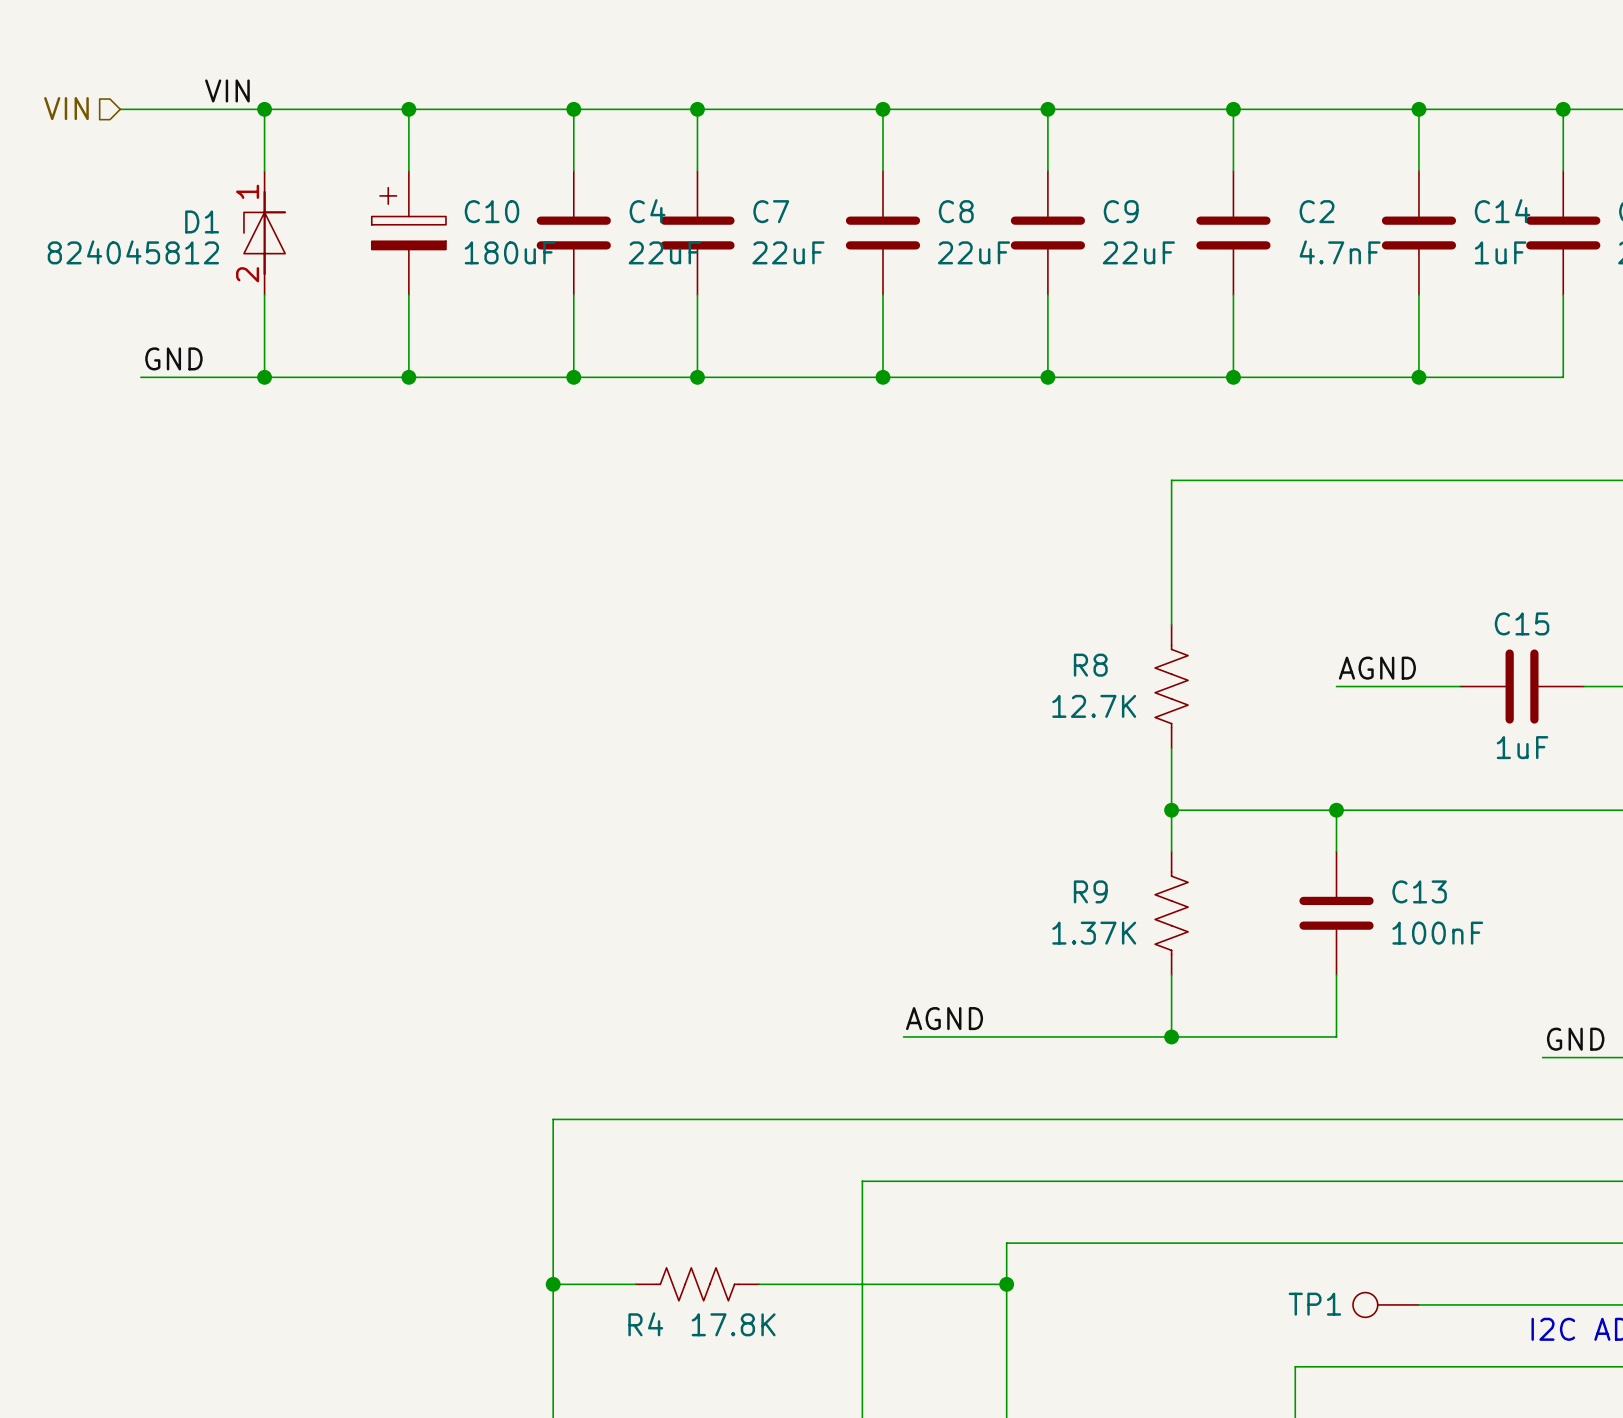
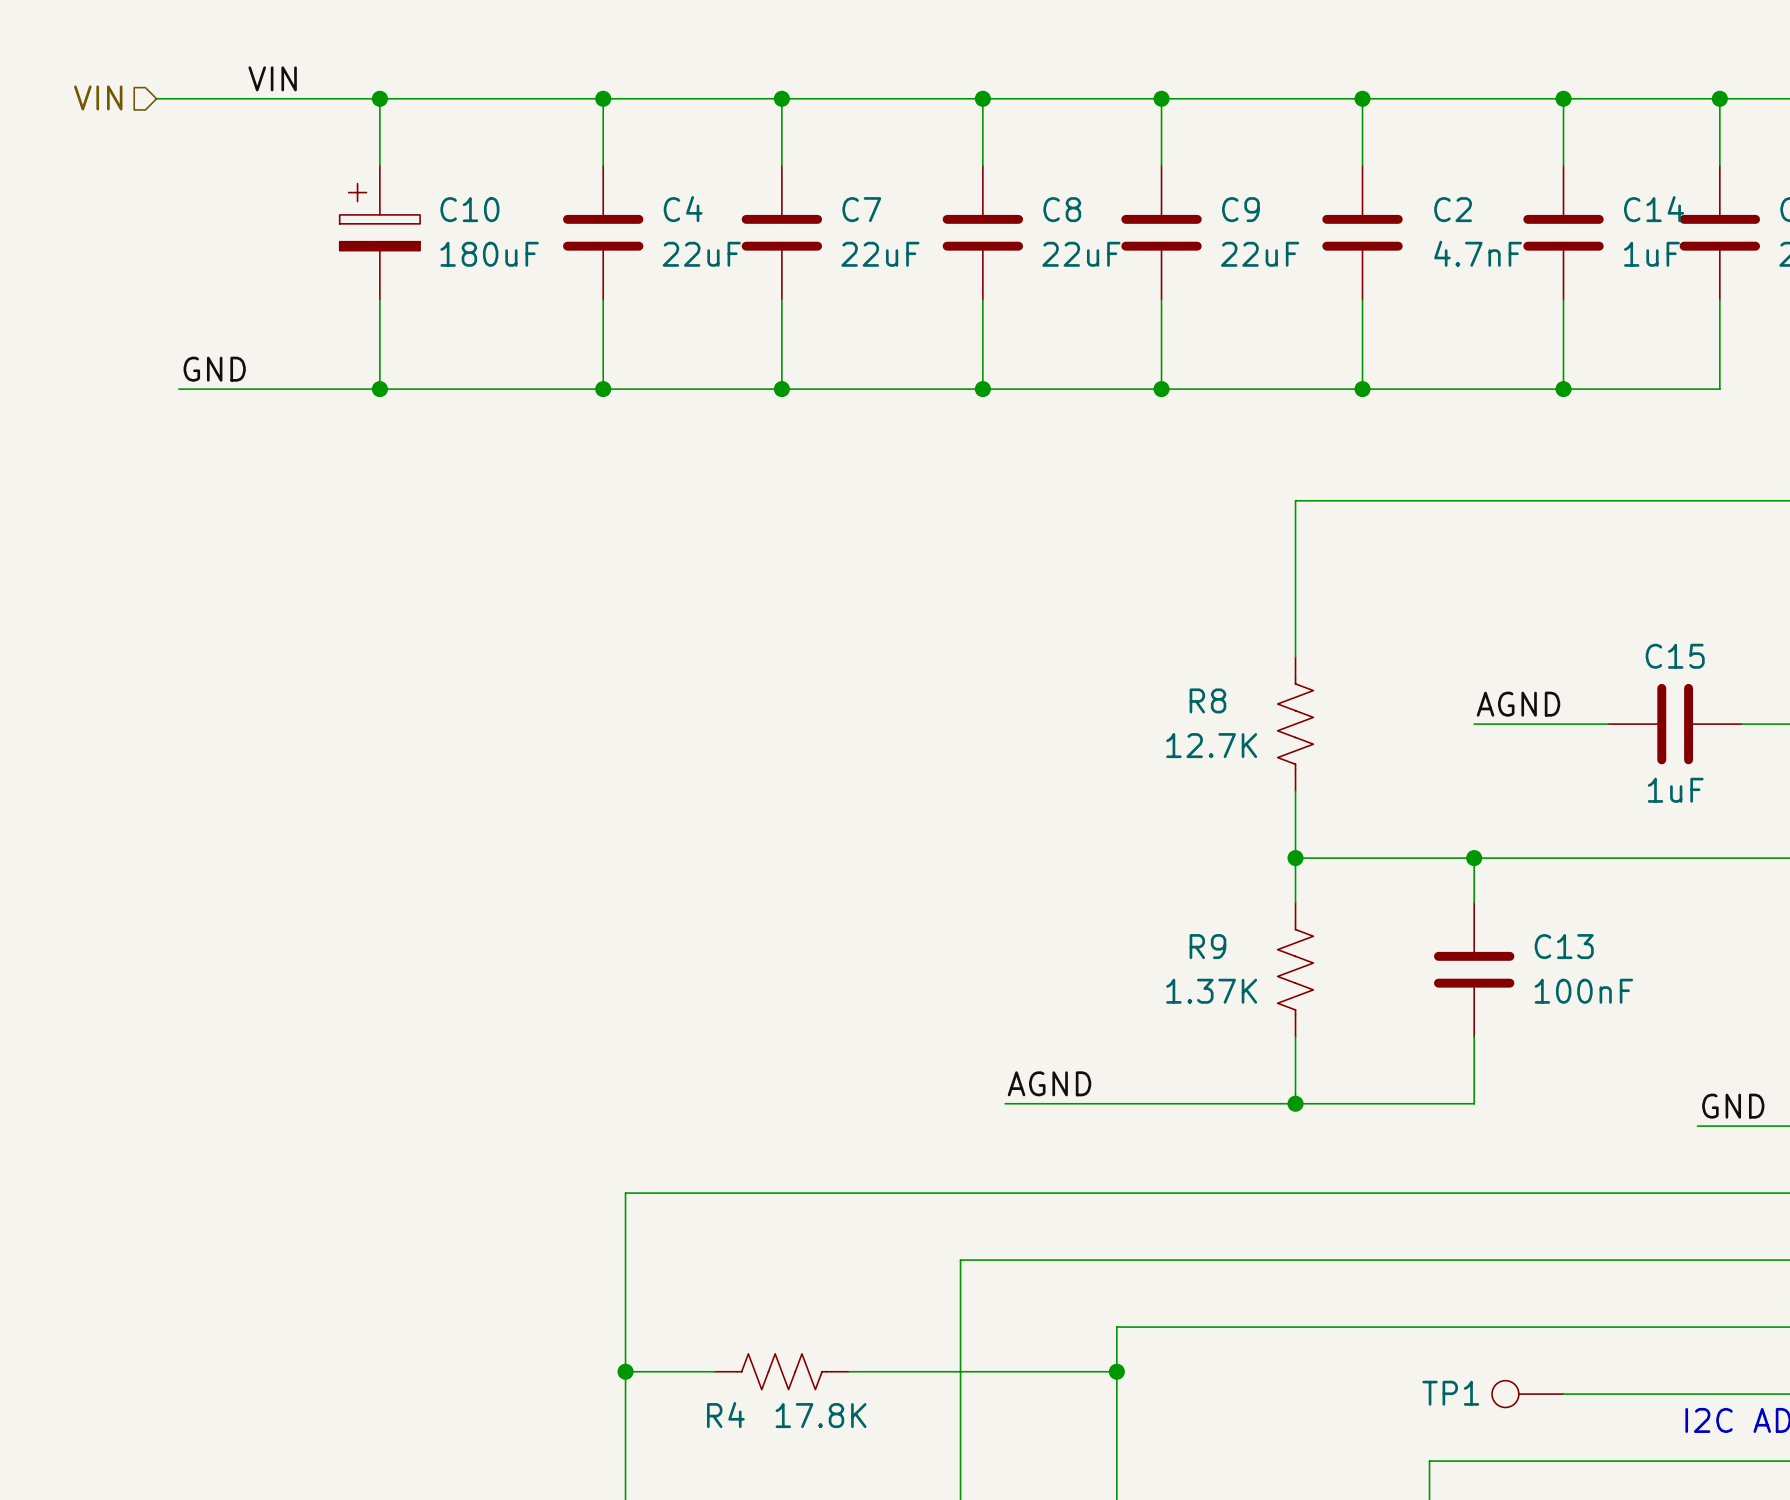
wire: (264, 109) (264, 171) -> (379, 98) (379, 165)
junction: (264, 109) -> none
junction: none -> (379, 98)
wire: (408, 109) (408, 171) -> none
junction: (408, 109) -> none
wire: (573, 109) (573, 171) -> (603, 98) (603, 165)
junction position: (573, 109) -> (603, 98)
D1: 824045812 (264, 233) -> none
C10 position: (408, 233) -> (379, 232)
C4 position: (573, 233) -> (603, 232)
wire: (264, 294) (264, 377) -> (379, 299) (379, 389)
wire: (408, 294) (408, 377) -> none
wire: (573, 294) (573, 377) -> (603, 299) (603, 389)
junction: (264, 377) -> none
junction: none -> (379, 389)
junction: (408, 377) -> none
junction position: (573, 377) -> (603, 389)

